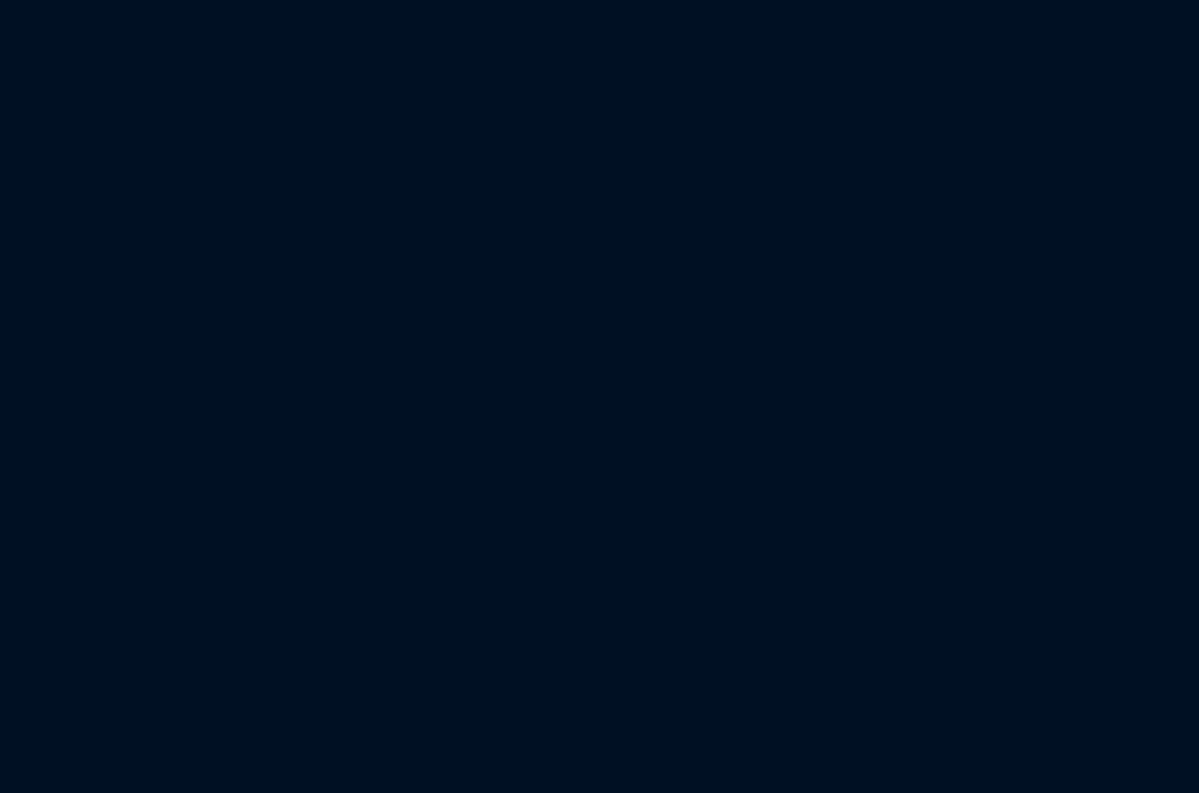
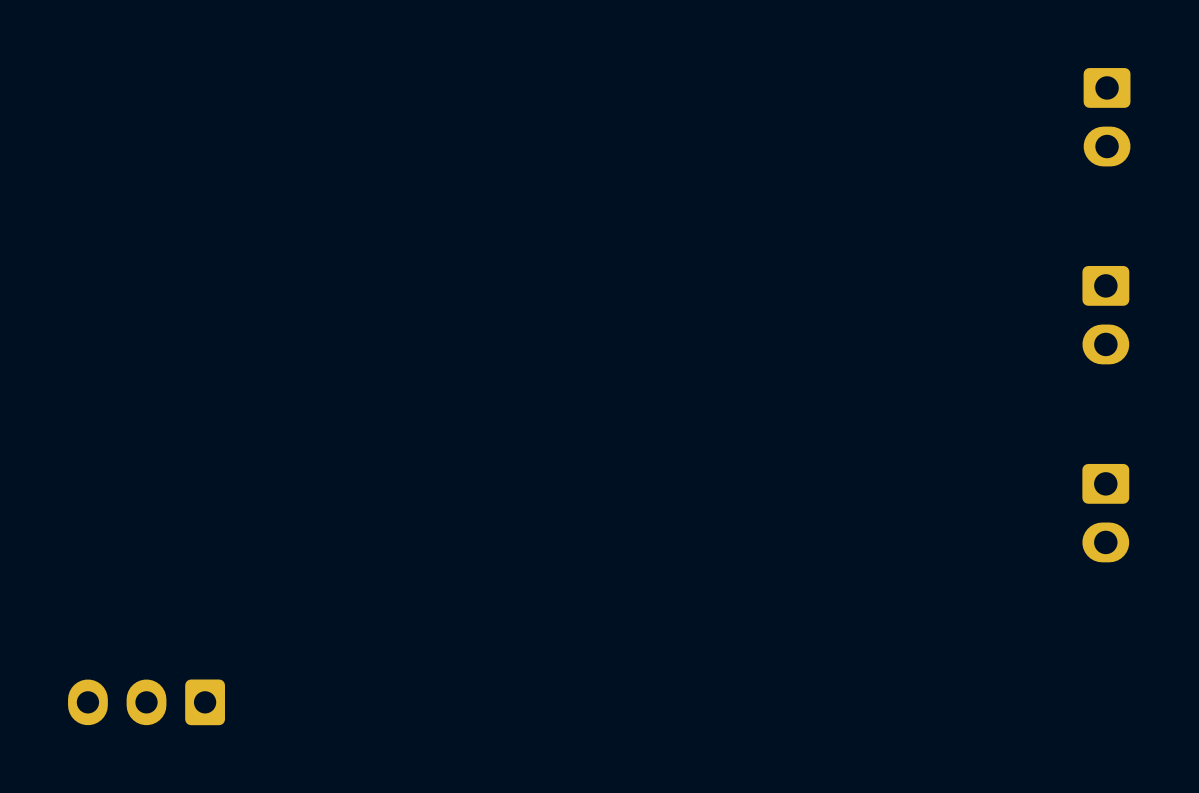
part: none -> (1107, 117)
part: none -> (1105, 315)
part: none -> (1105, 513)
part: none -> (146, 702)

